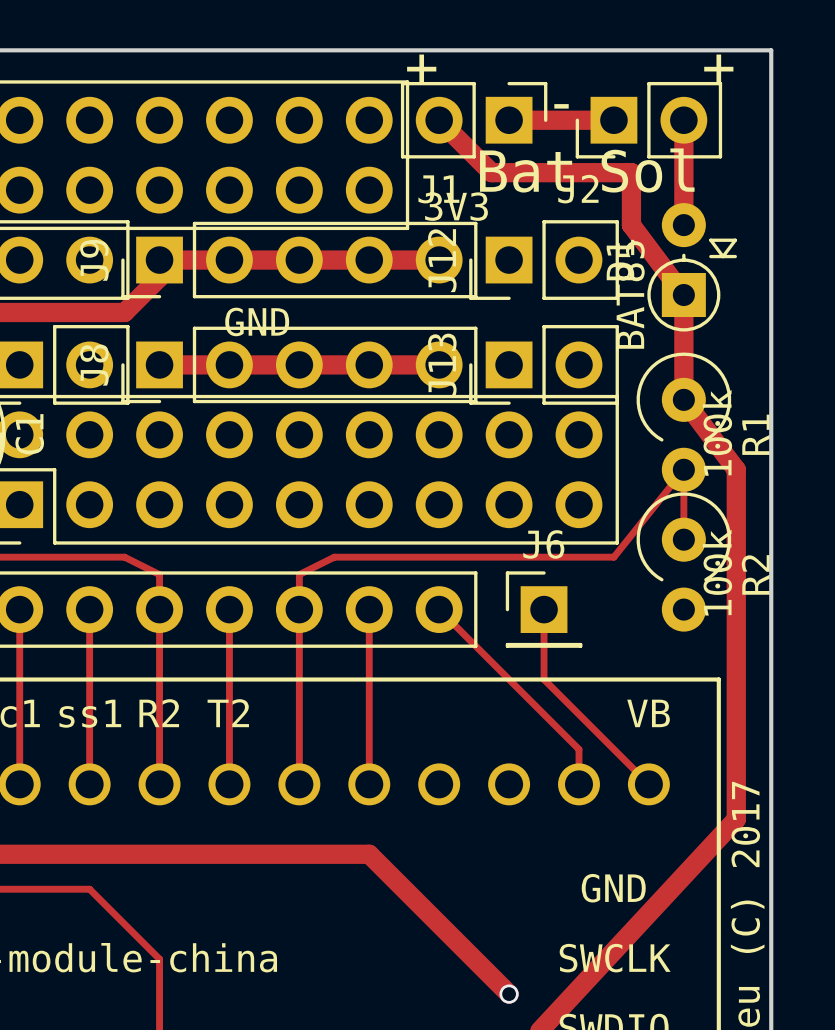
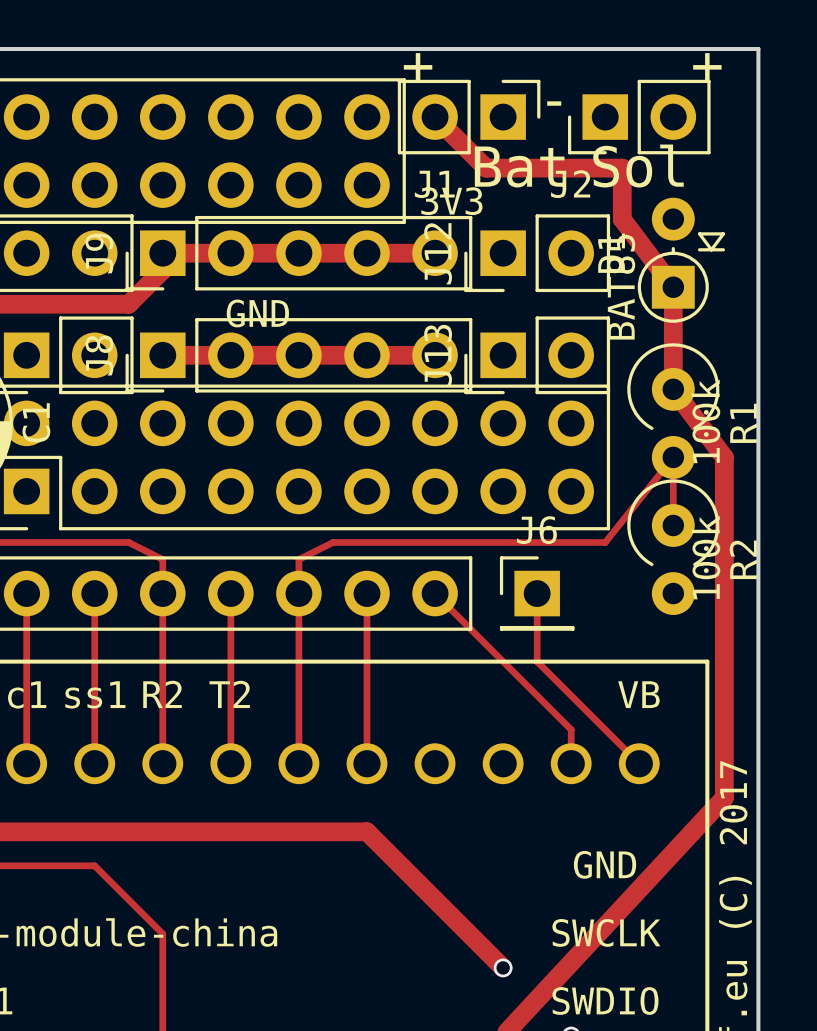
track: (509, 120) (613, 120) -> none
track: (683, 120) (683, 225) -> none

